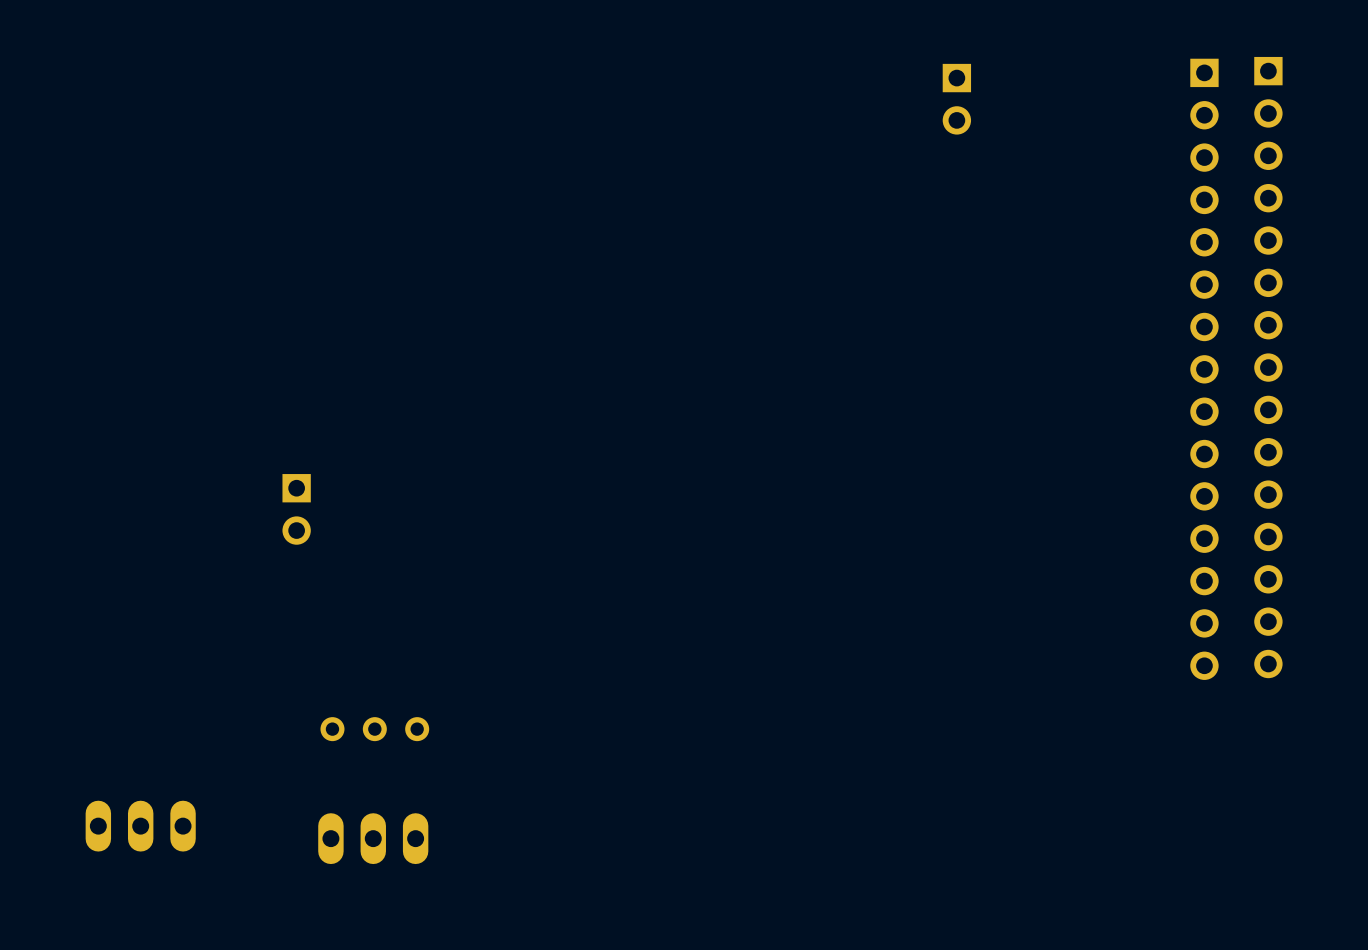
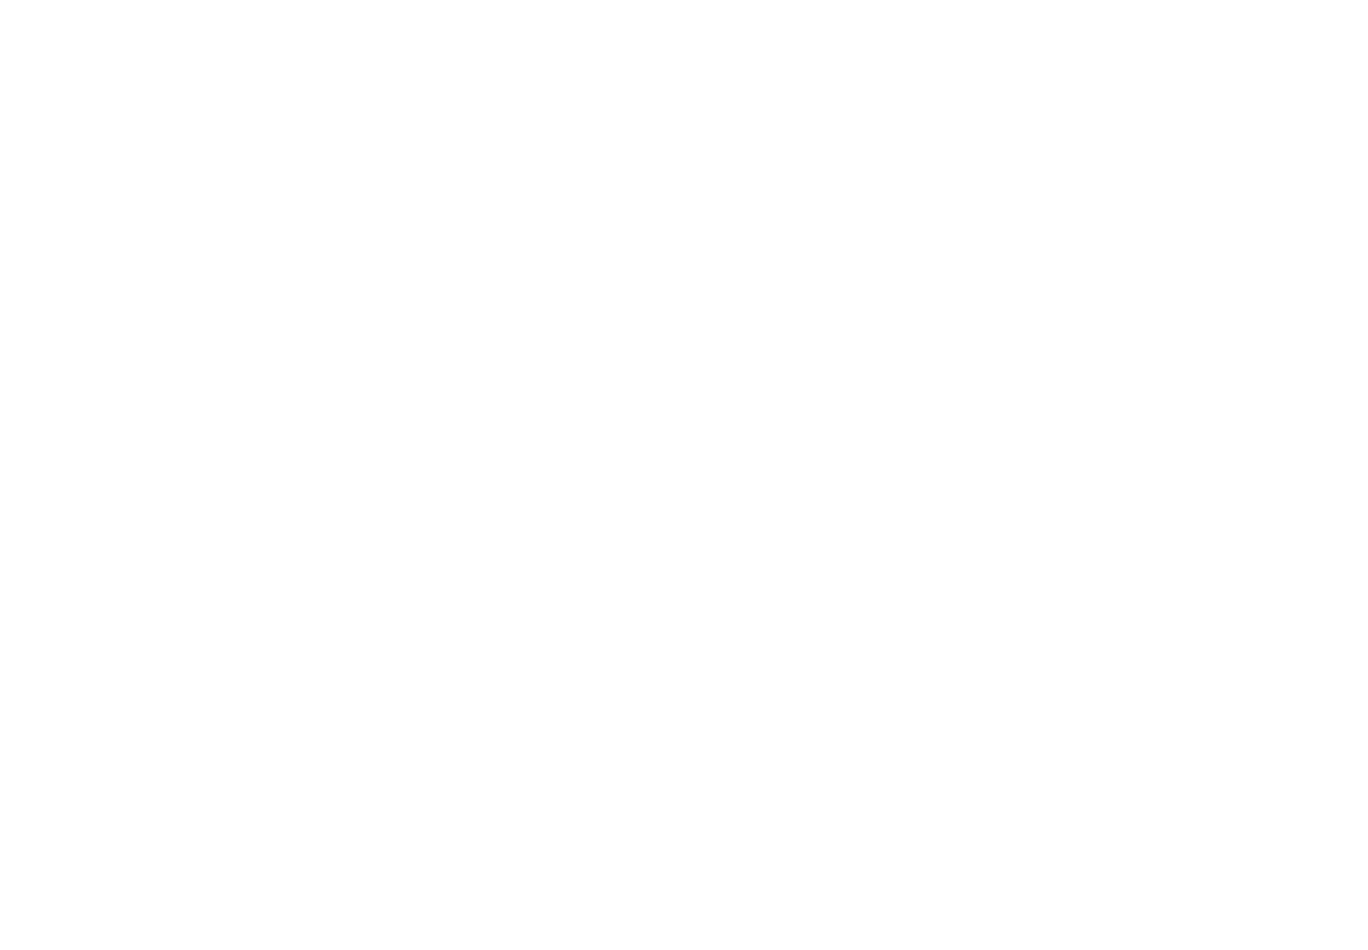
part: (956, 99) -> none
part: (1268, 367) -> none
part: (1204, 369) -> none
part: (296, 509) -> none
part: (374, 729) -> none
part: (140, 826) -> none
part: (373, 838) -> none

